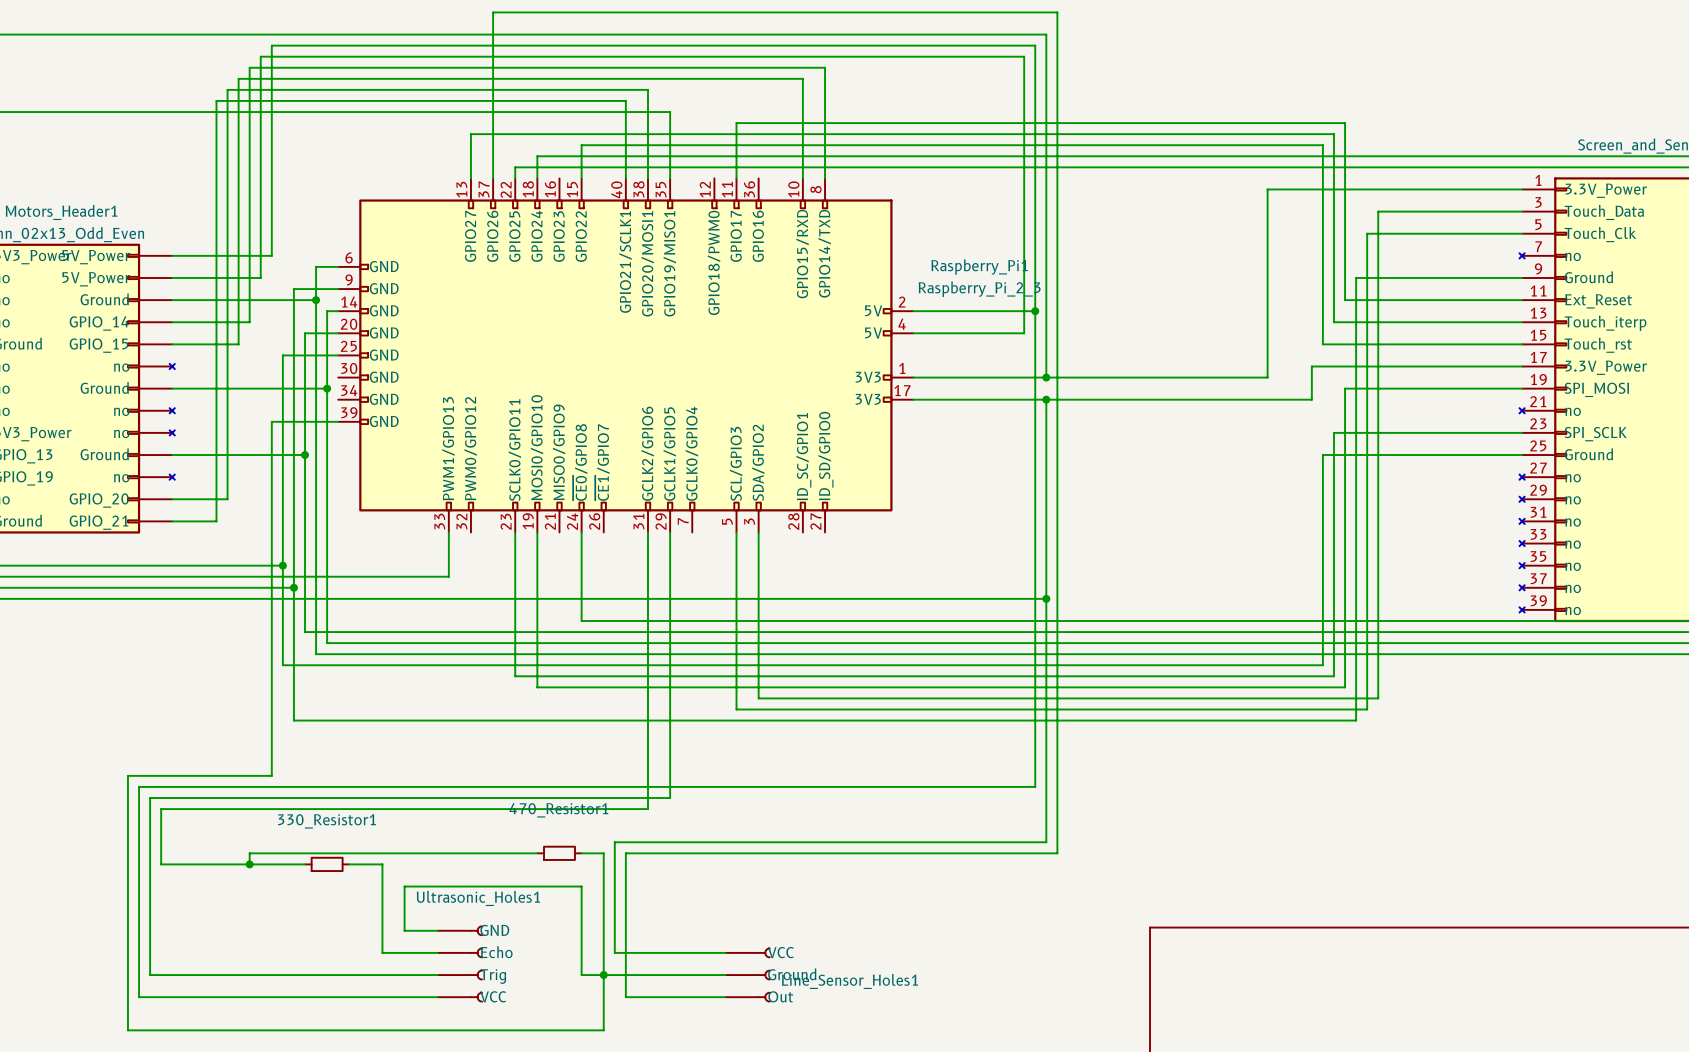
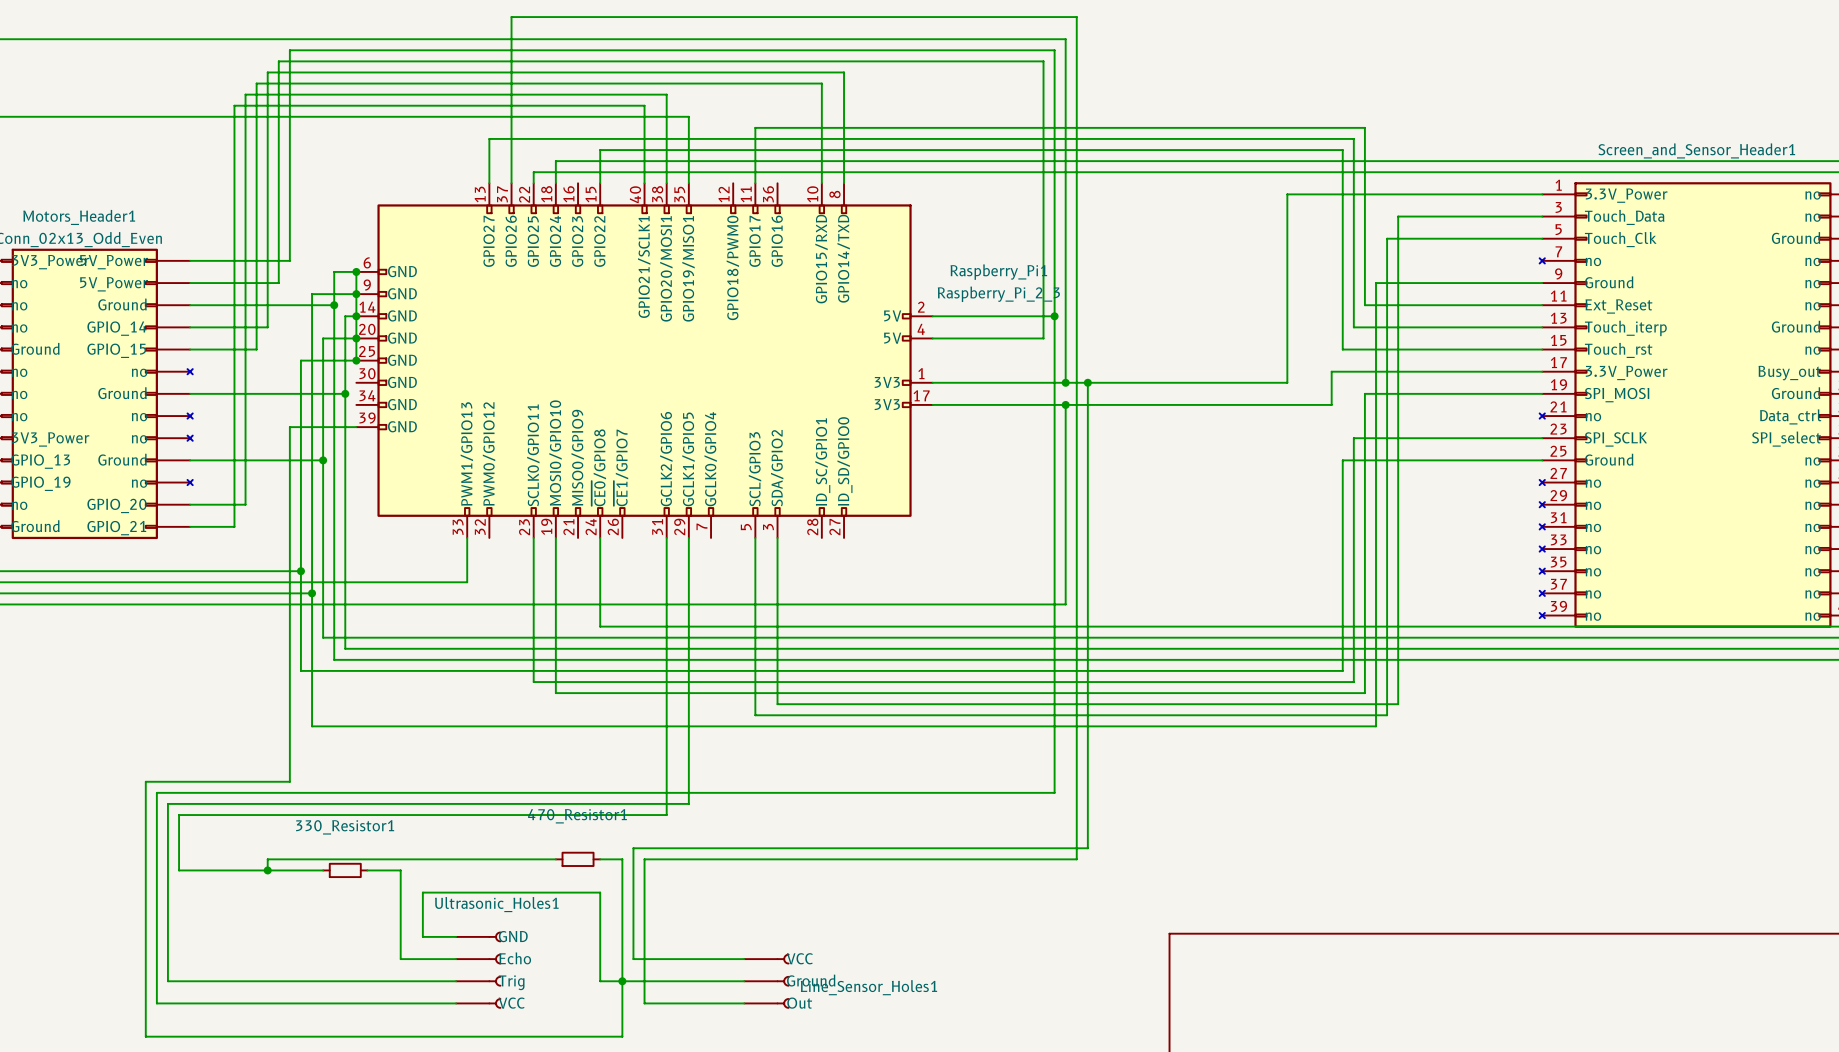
wire: none -> (356, 271) (356, 360)
junction: none -> (356, 271)
junction: none -> (356, 294)
junction: none -> (356, 316)
junction: none -> (356, 338)
junction: none -> (356, 360)
junction: none -> (1087, 382)
wire: (1046, 598) (1046, 842) -> (1087, 382) (1087, 848) (1065, 848)
junction: (1046, 598) -> none

